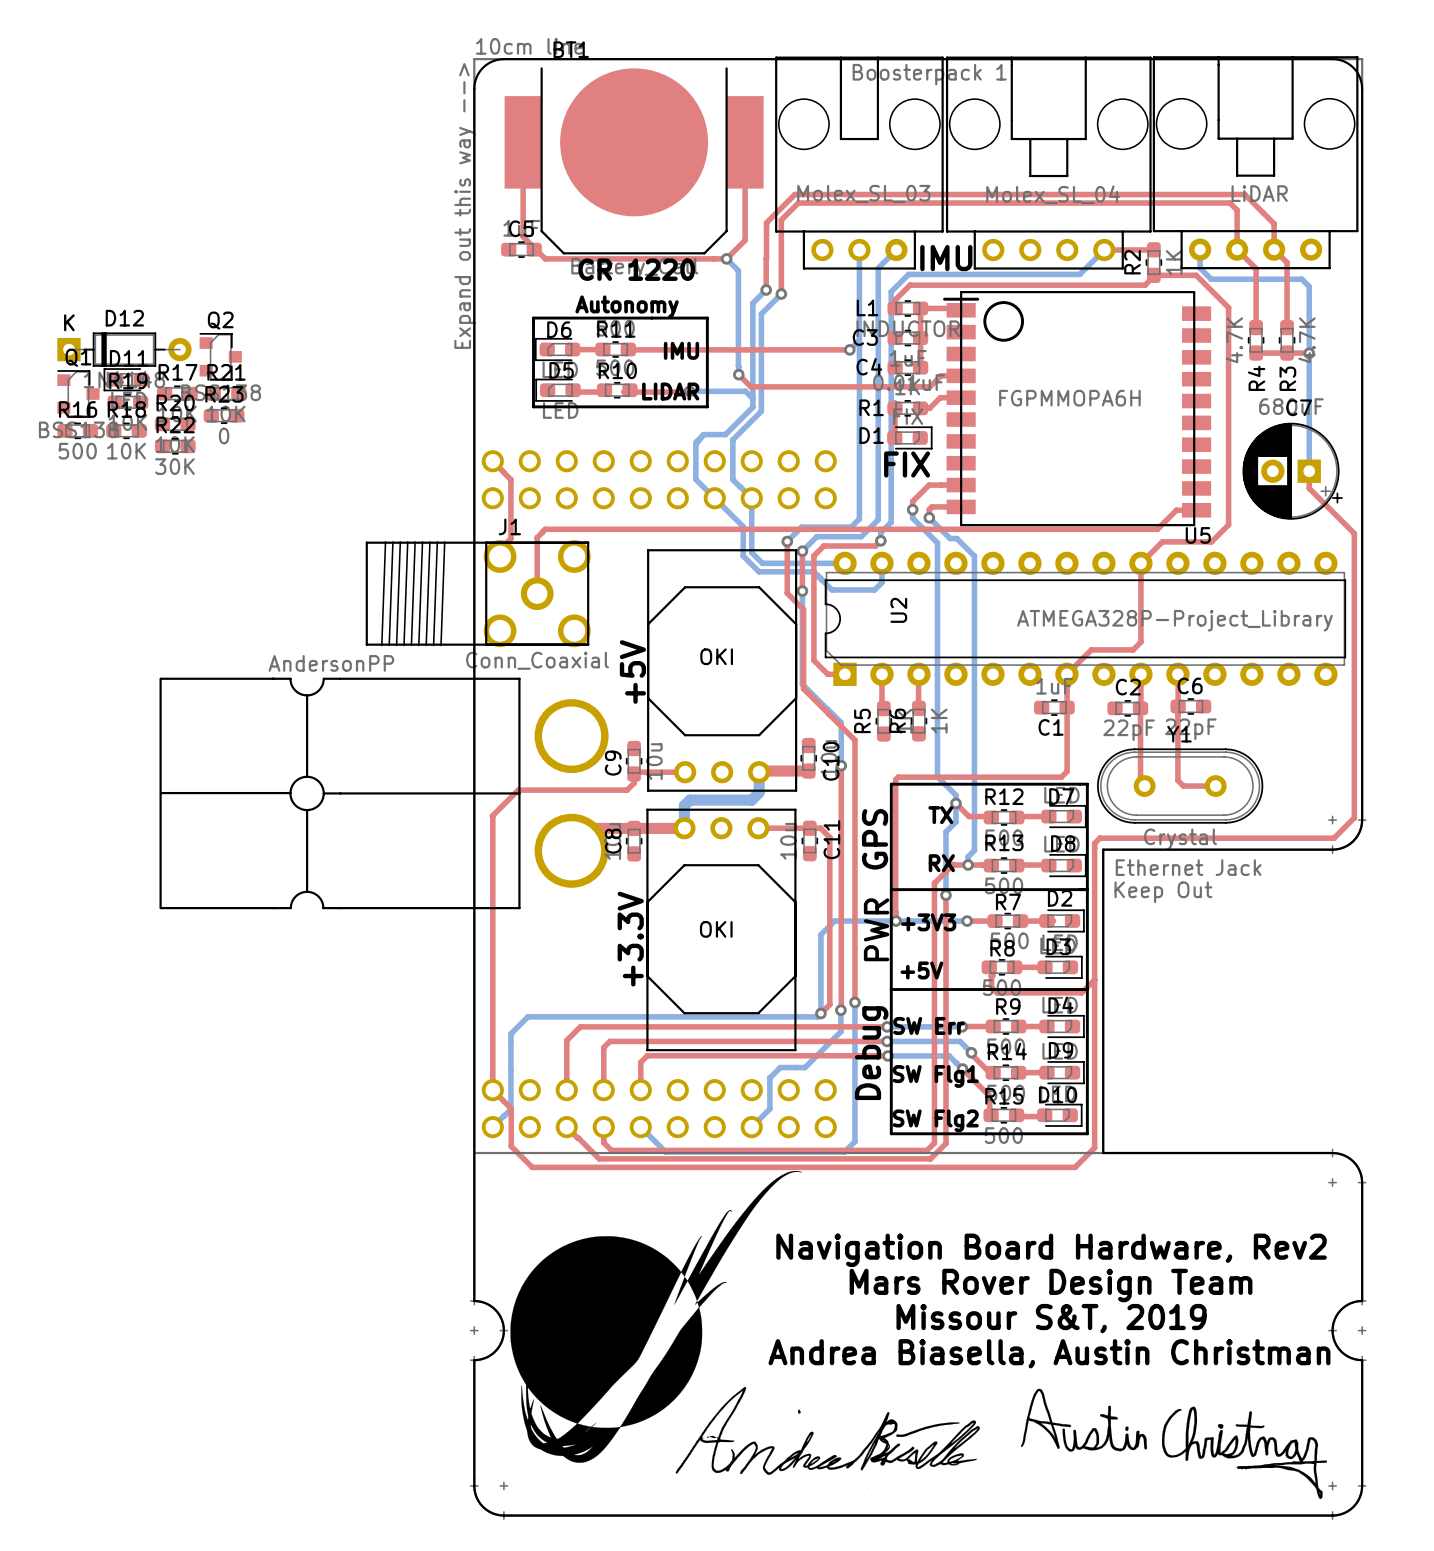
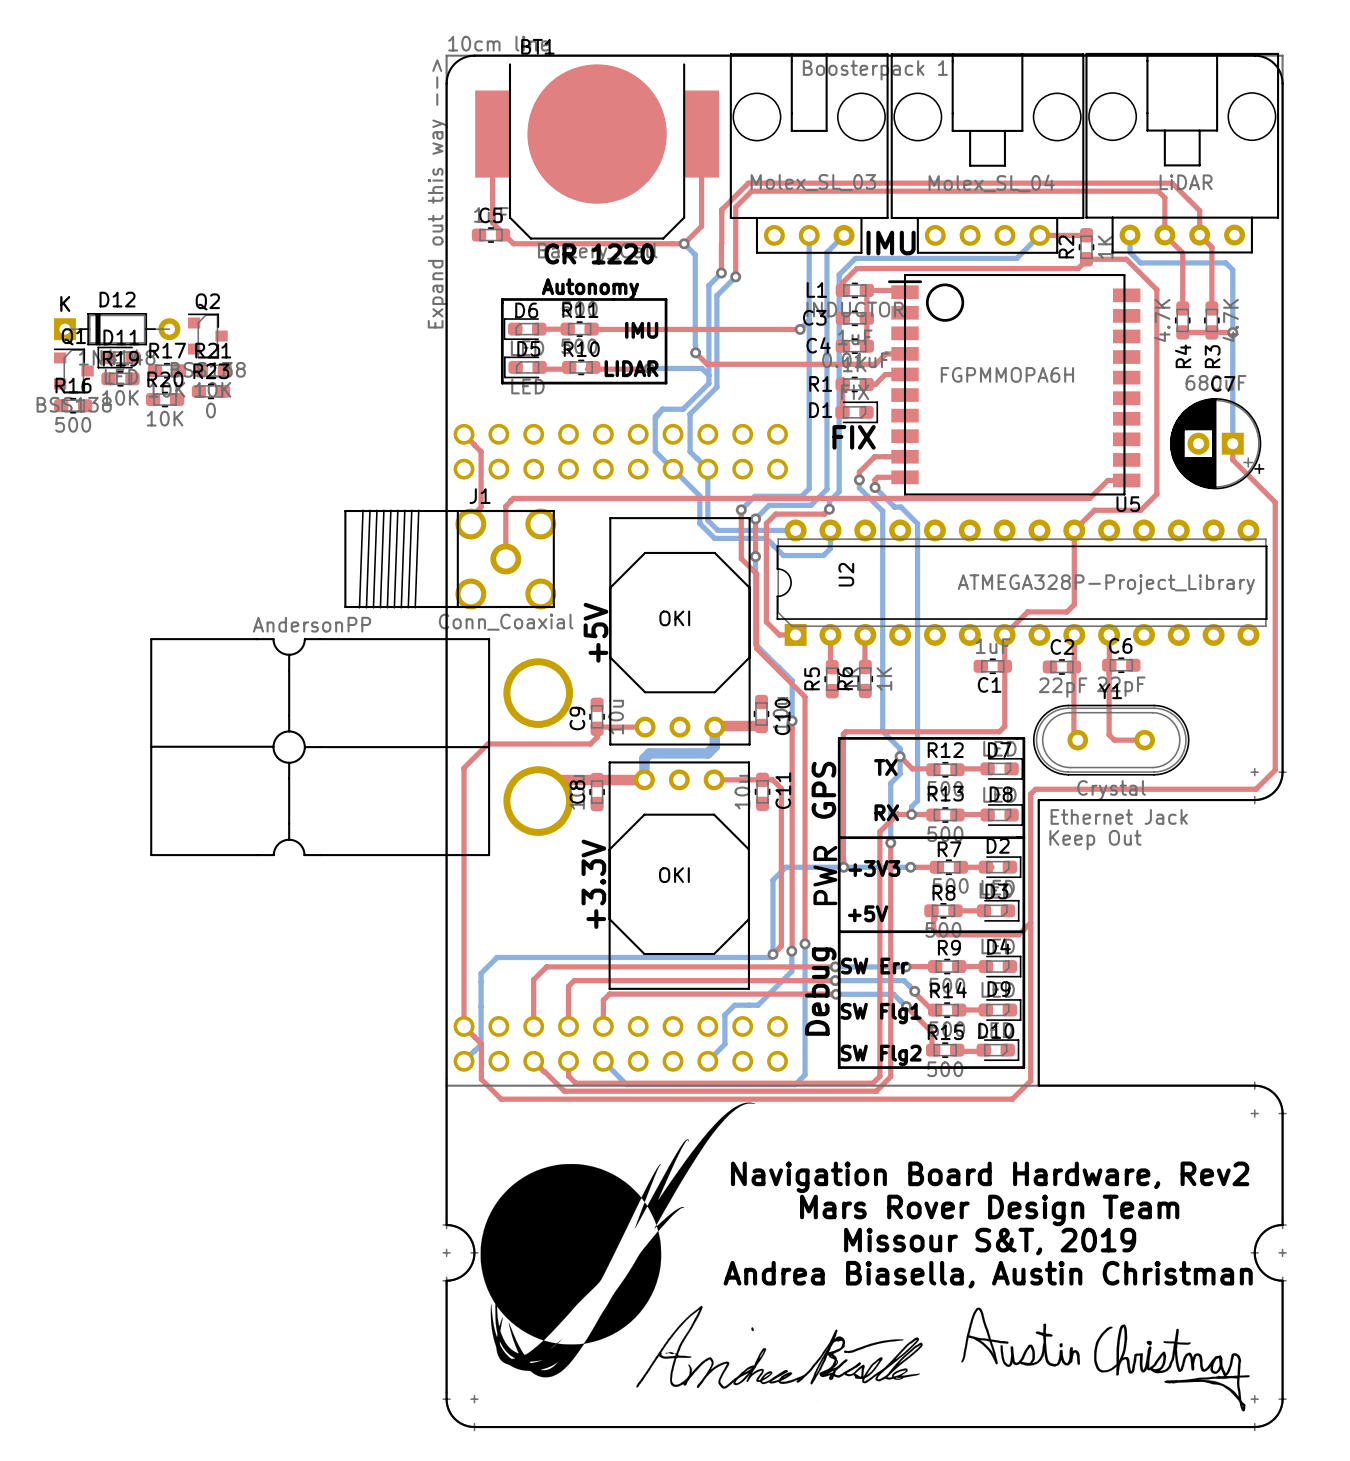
R18: 10K (126, 430) -> none
R22: 30K (175, 446) -> none

